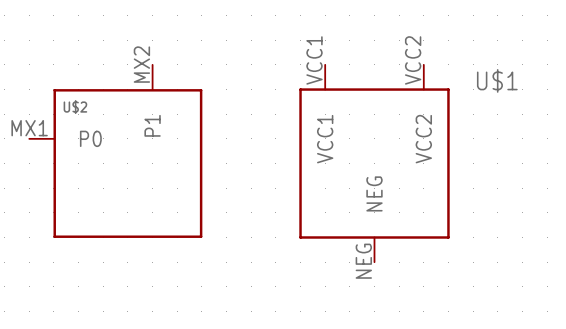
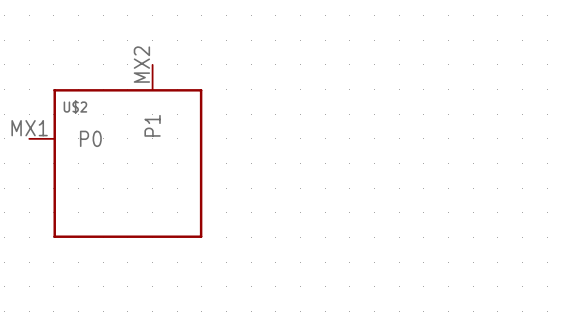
U$1: (374, 163) -> none

